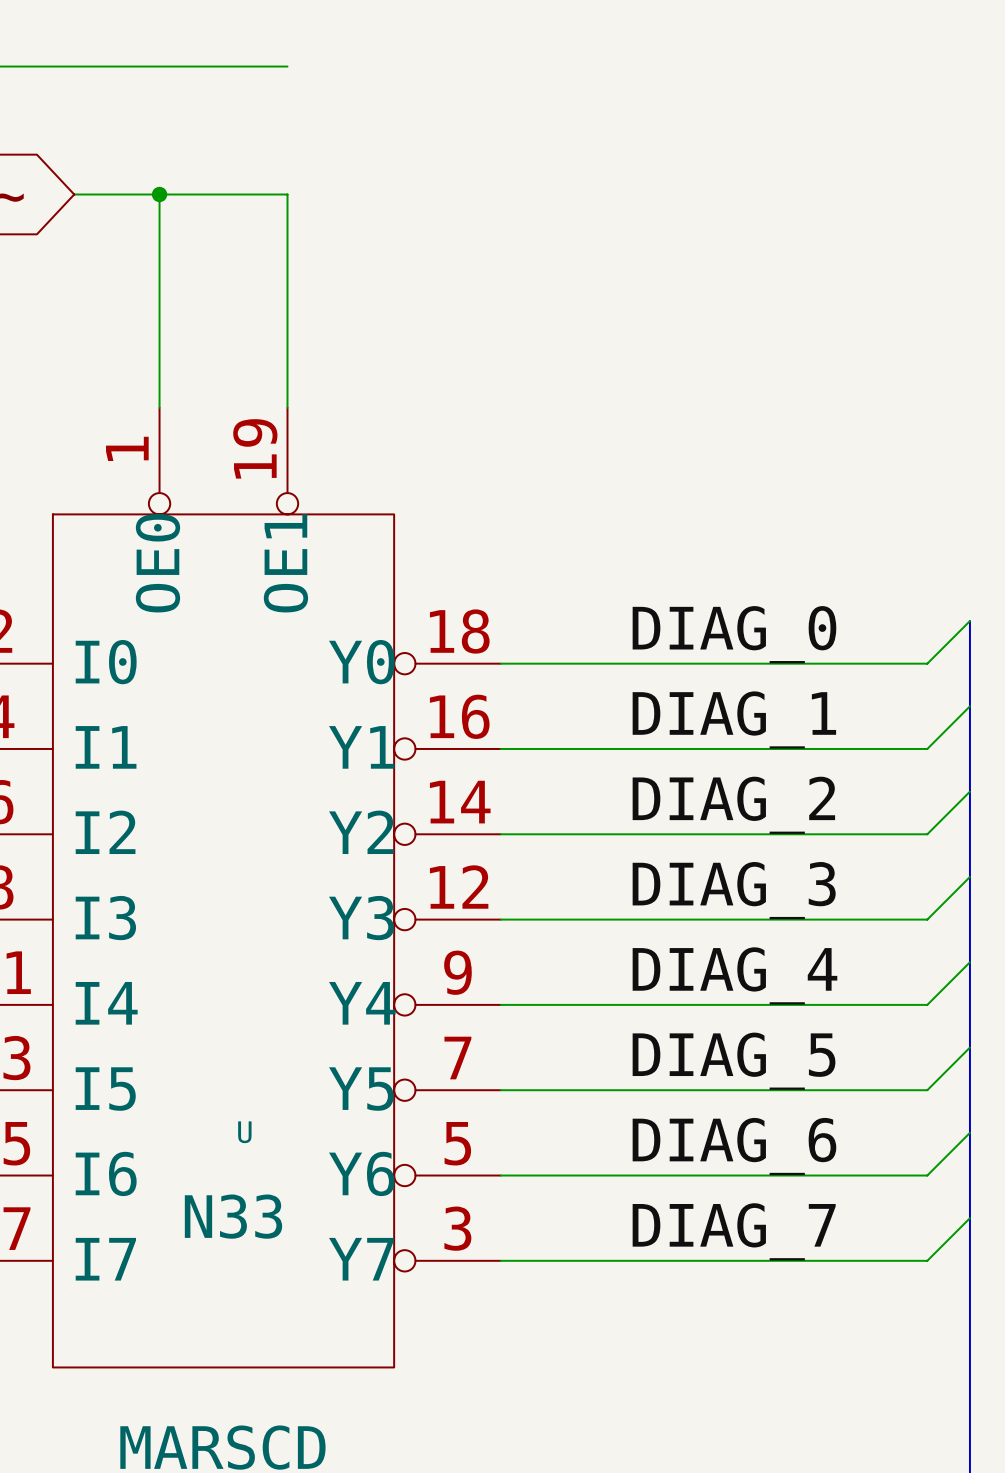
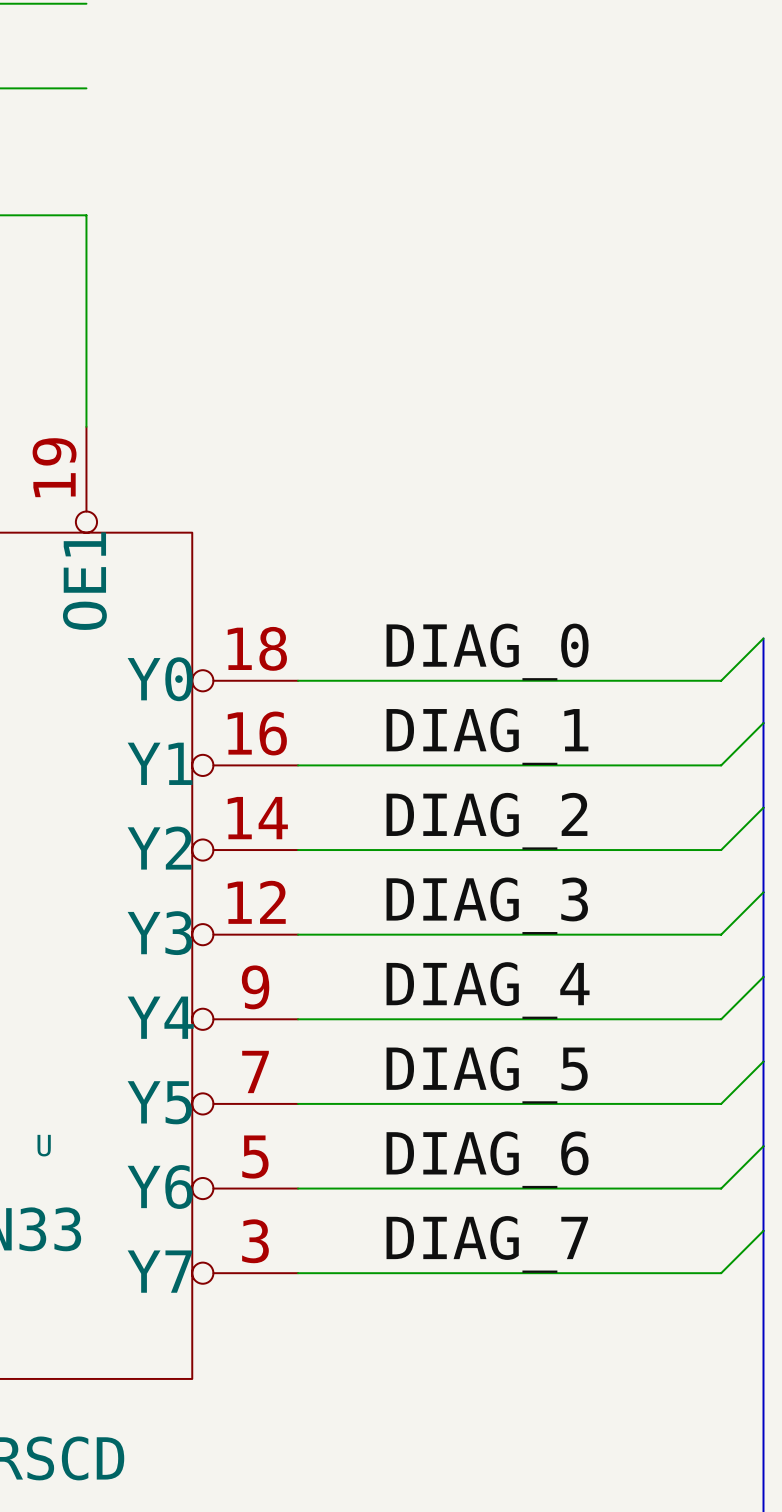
label position: DIAG_0 (734, 634) -> DIAG_0 (487, 652)
label position: DIAG_1 (734, 719) -> DIAG_1 (487, 736)
label position: DIAG_2 (733, 805) -> DIAG_2 (486, 821)
label position: DIAG_3 (734, 890) -> DIAG_3 (487, 905)
label position: DIAG_4 (734, 975) -> DIAG_4 (488, 990)
label position: DIAG_5 (734, 1061) -> DIAG_5 (487, 1075)
label position: DIAG_6 (734, 1146) -> DIAG_6 (487, 1159)
label position: DIAG_7 (734, 1231) -> DIAG_7 (487, 1244)

